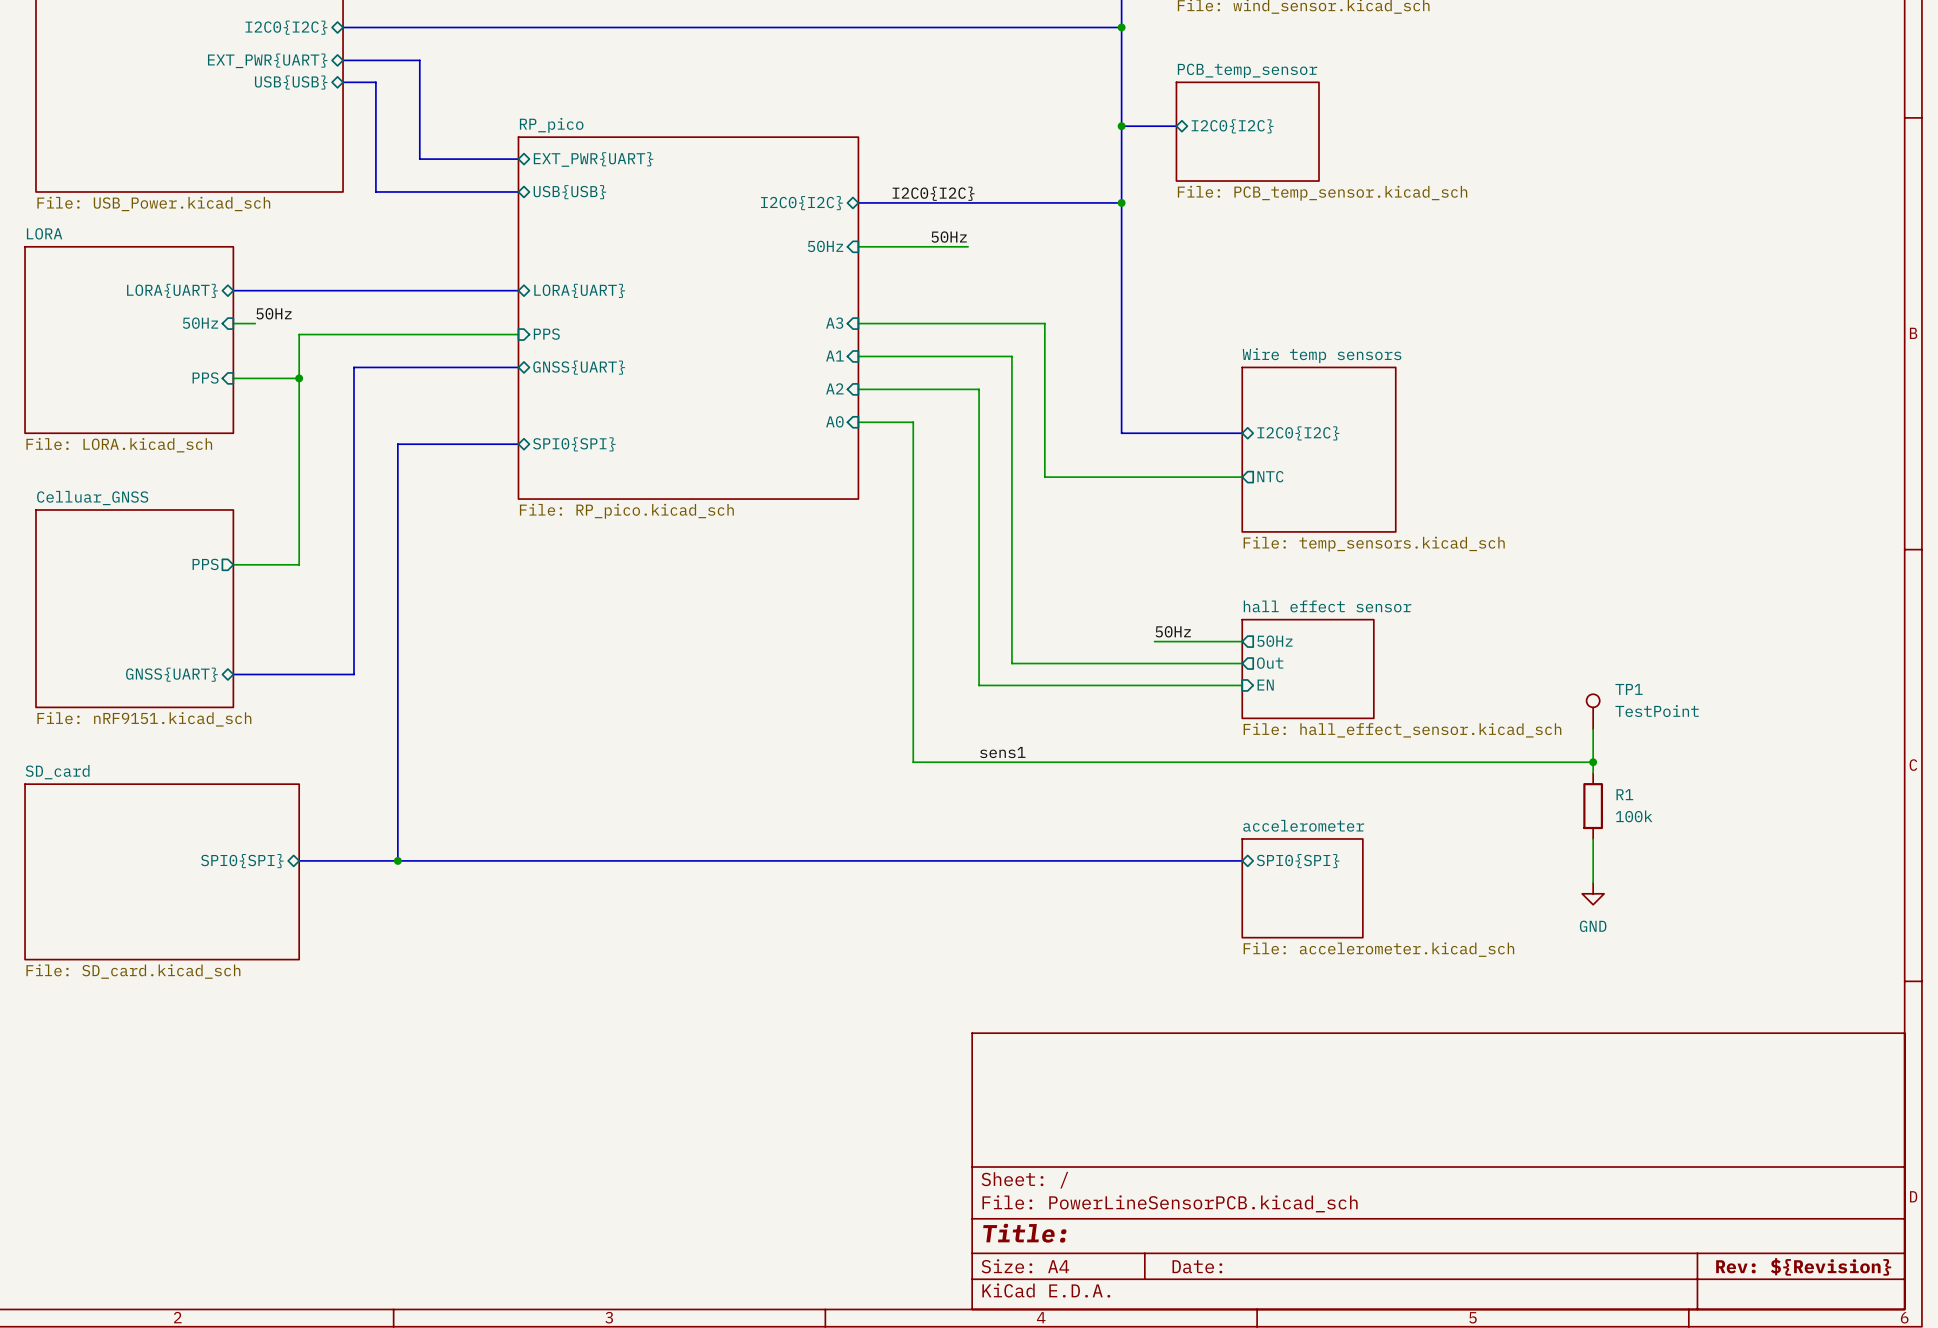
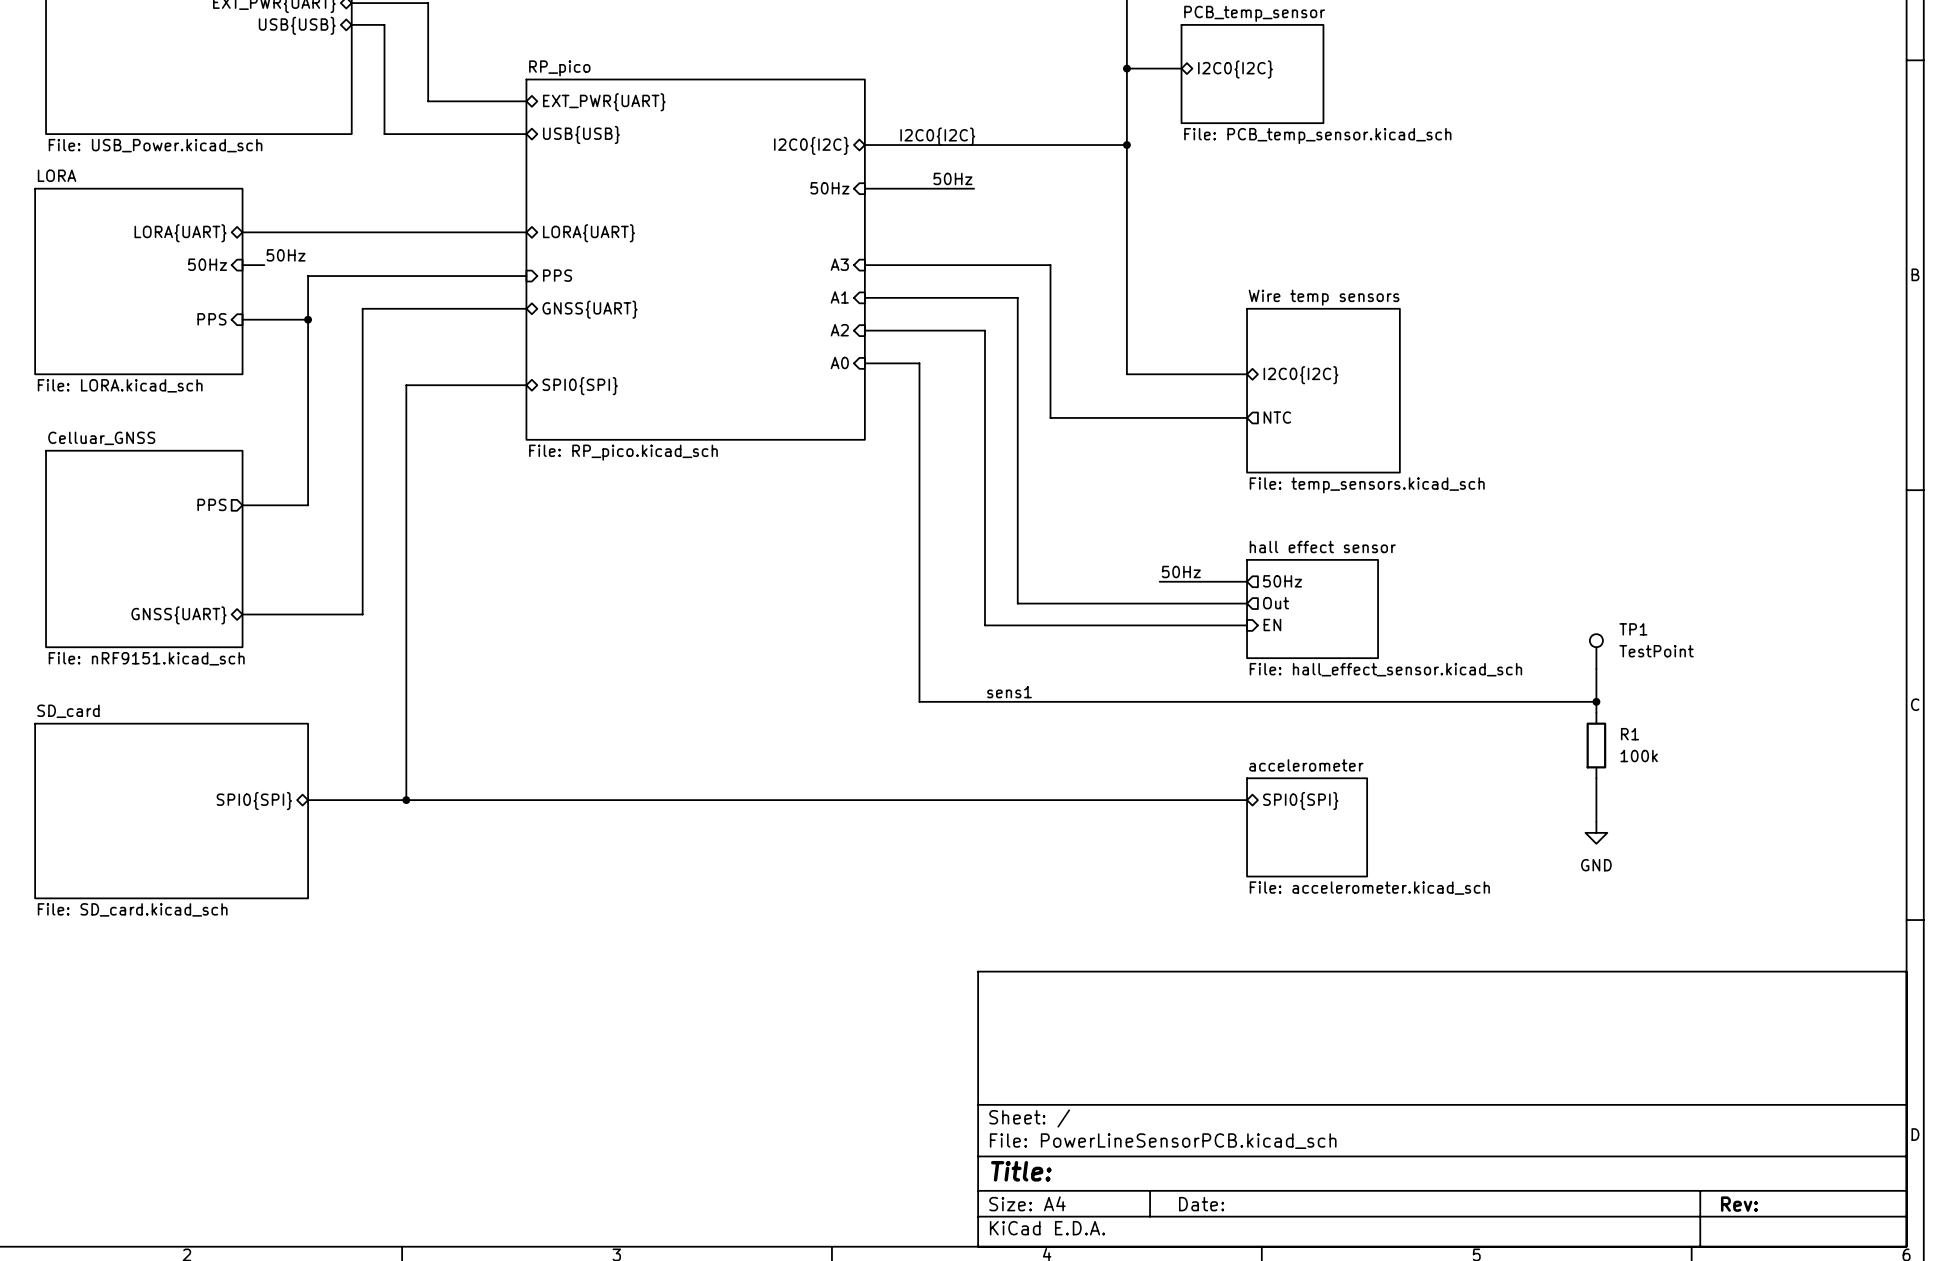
title block: Rev: ${Revision} (1803, 1266) -> Rev: (1739, 1204)

